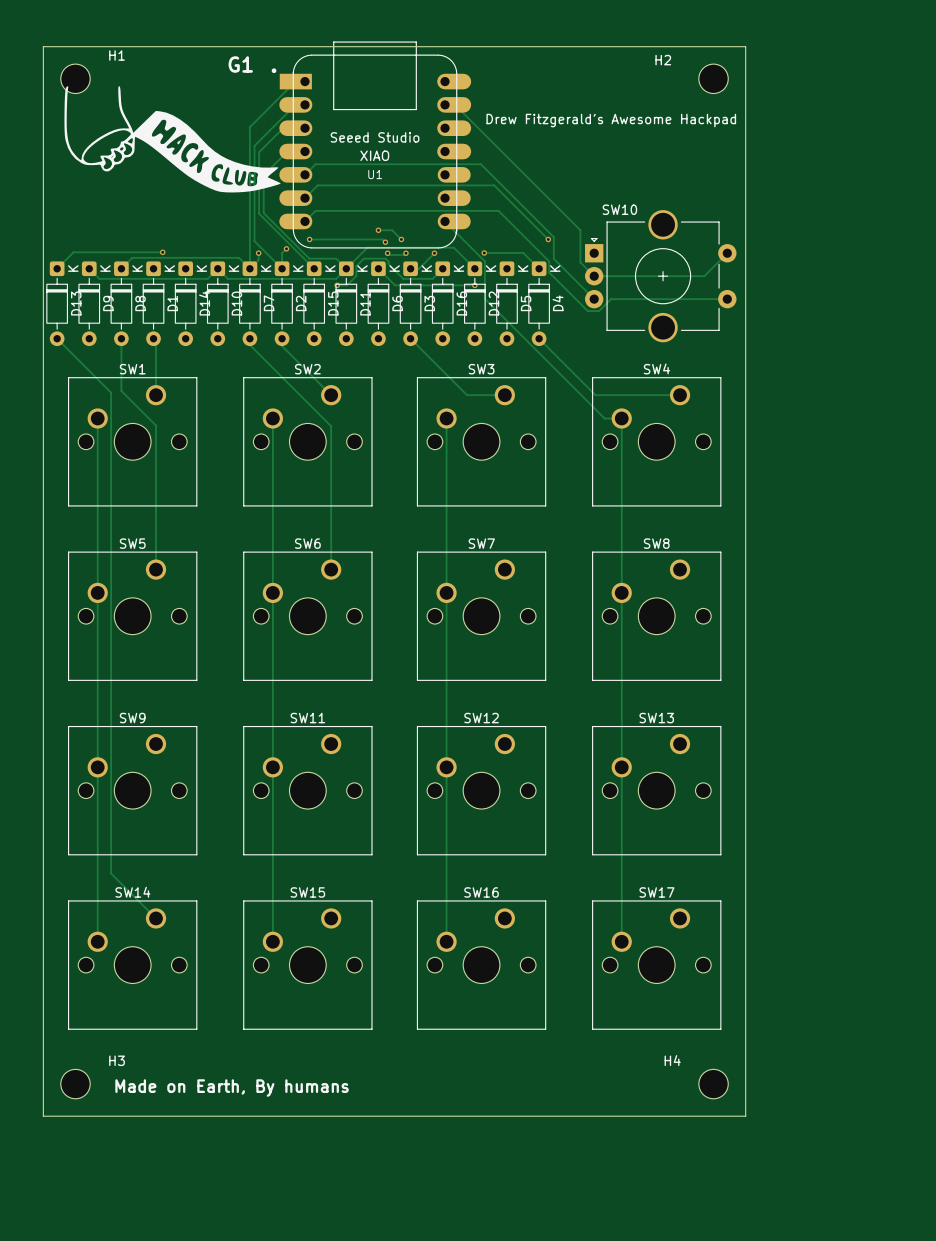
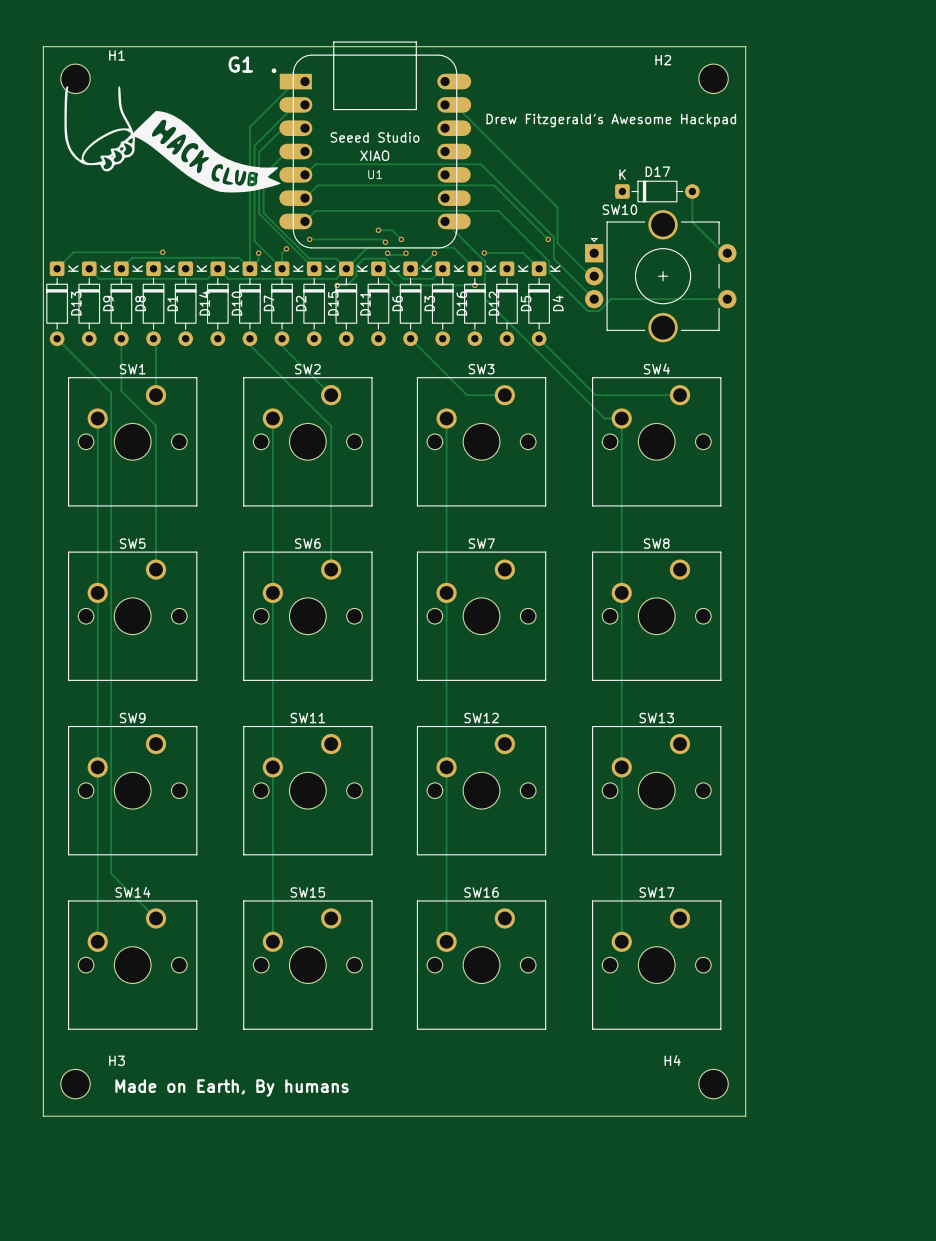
D17: none -> (657, 191)
track: none -> (692, 191) (692, 221) (722, 252)
track: (557, 207) (580, 230) (580, 262) (594, 276) (704, 276) (727, 253) -> (557, 207) (557, 243) (589, 275)

